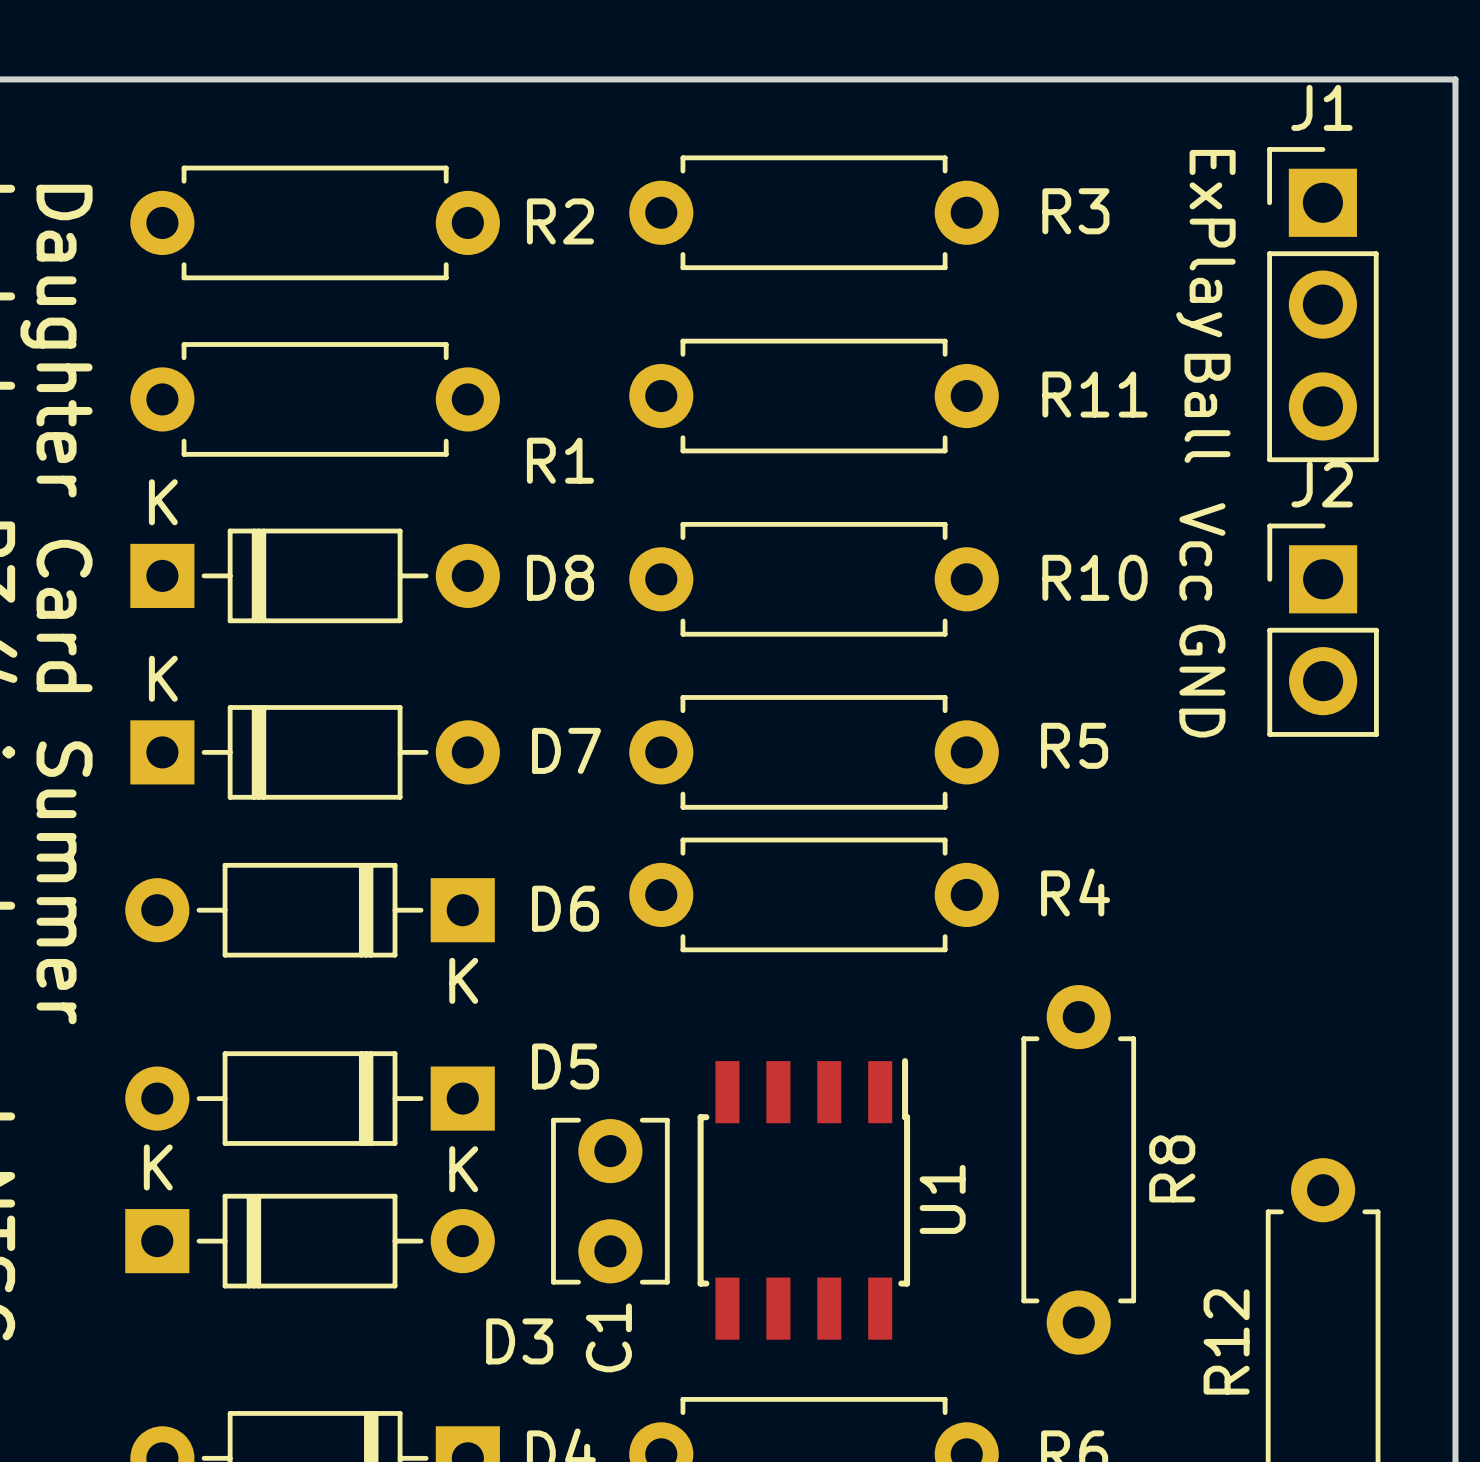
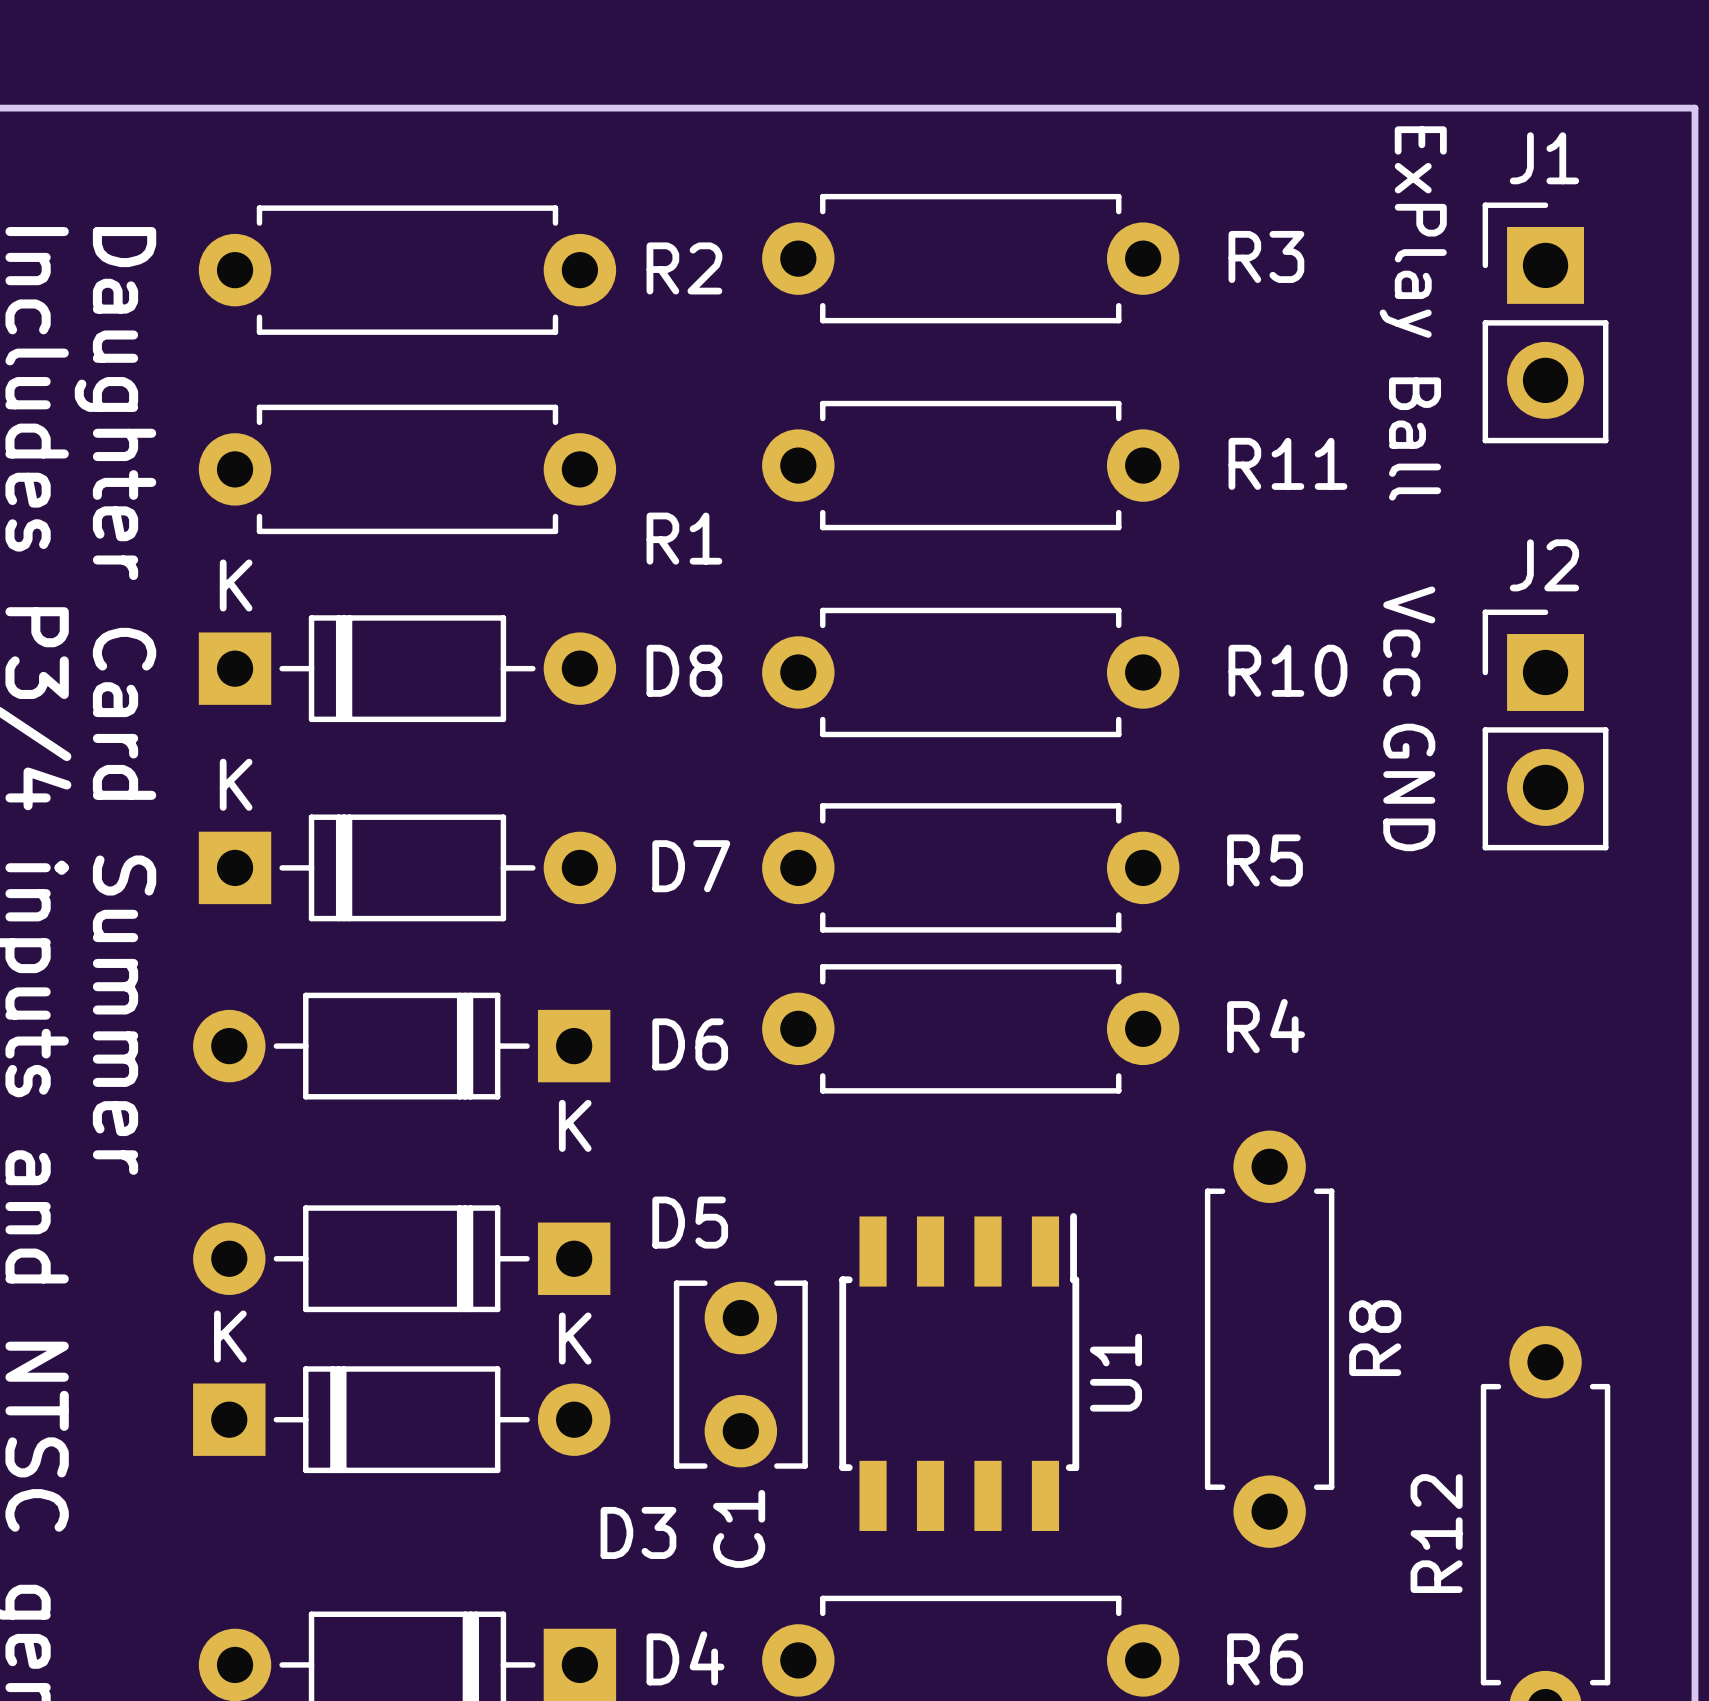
J1 footprint: [1267, 147, 1379, 463] -> [1482, 202, 1609, 444]
text position: ExPlay (1205, 243) -> ExPlay (1413, 232)
text position: Ball (1207, 408) -> Ball (1415, 438)

